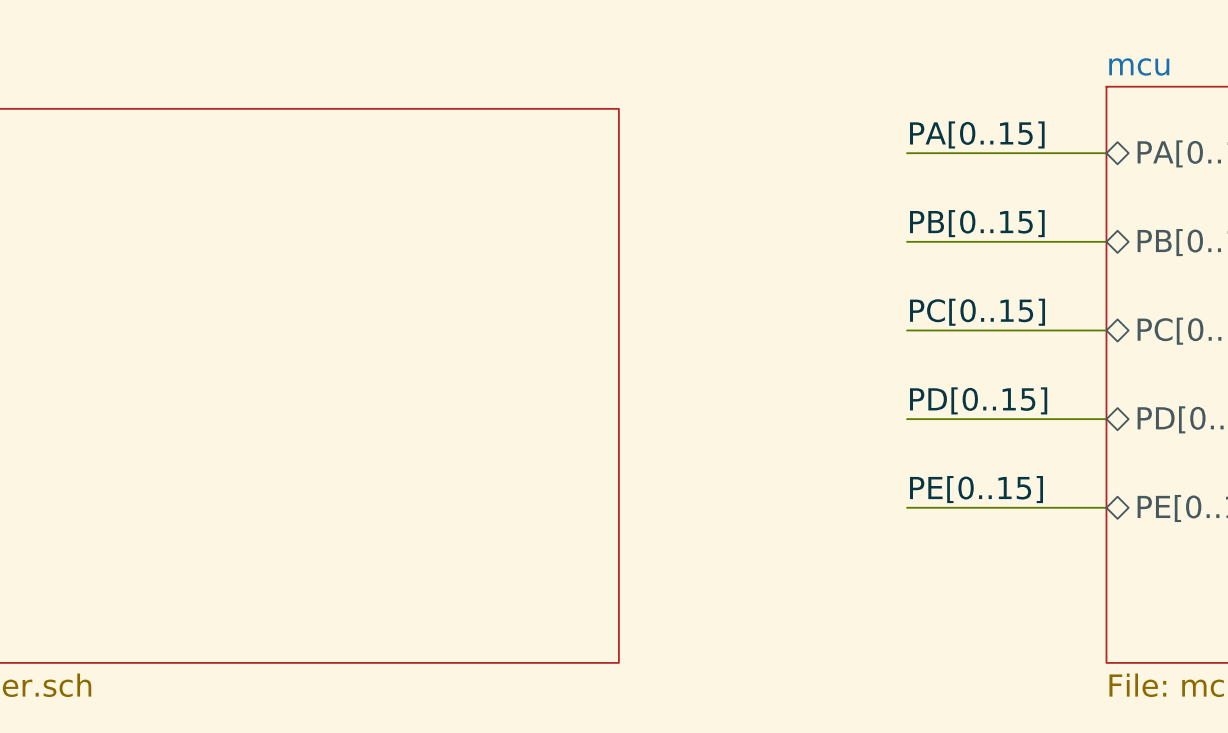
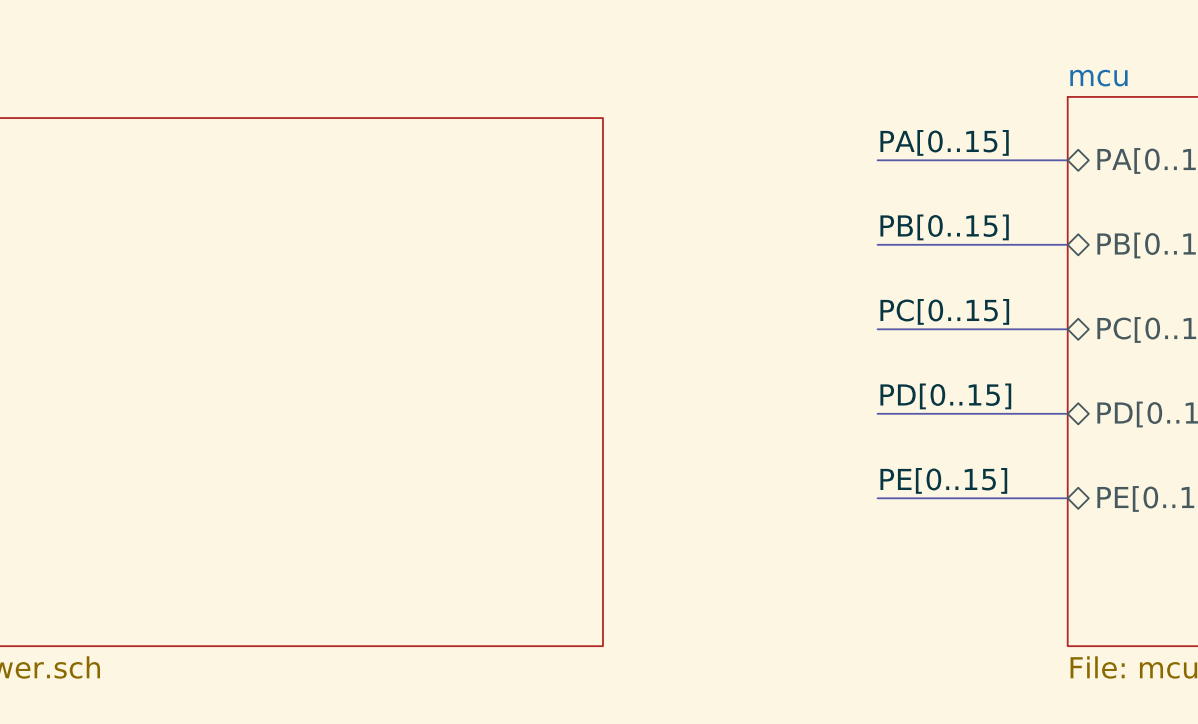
bus: none -> (877, 160) (1067, 160)
bus: none -> (877, 244) (1067, 244)
bus: none -> (877, 329) (1067, 329)
bus: none -> (877, 413) (1067, 413)
bus: none -> (877, 498) (1067, 498)

